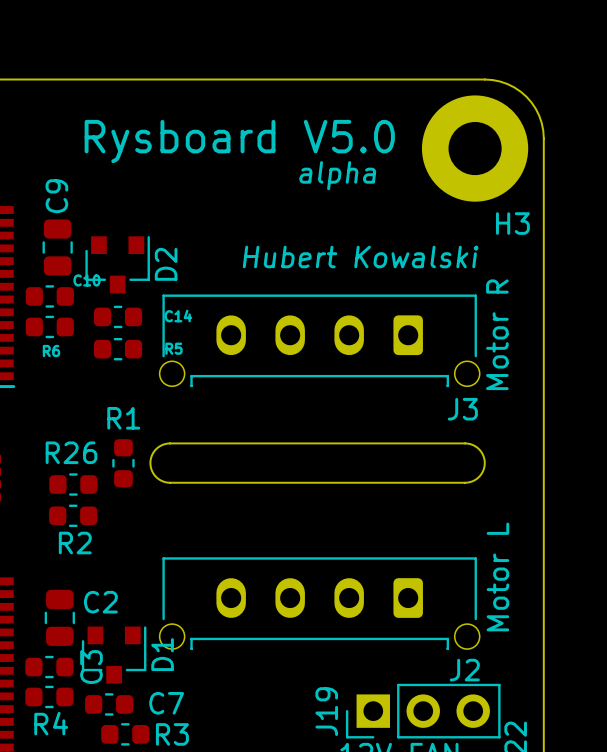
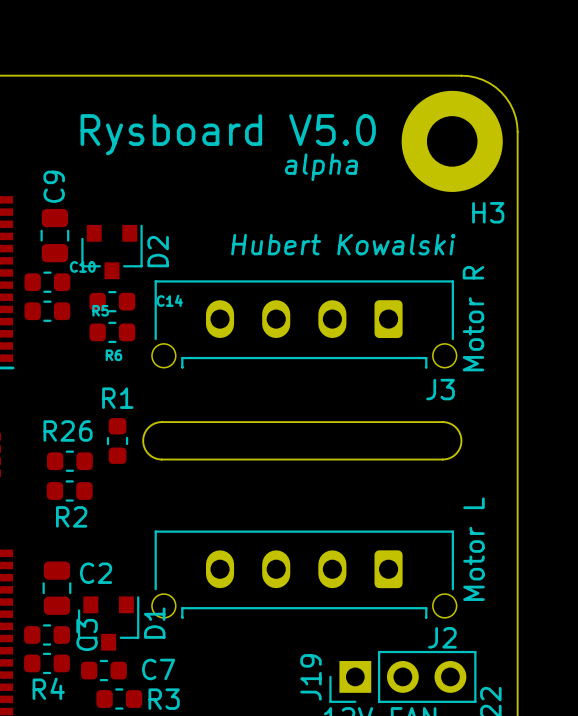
R5 name: R5 (173, 348) -> R6 (113, 355)
R6 name: R6 (51, 351) -> R5 (100, 310)

